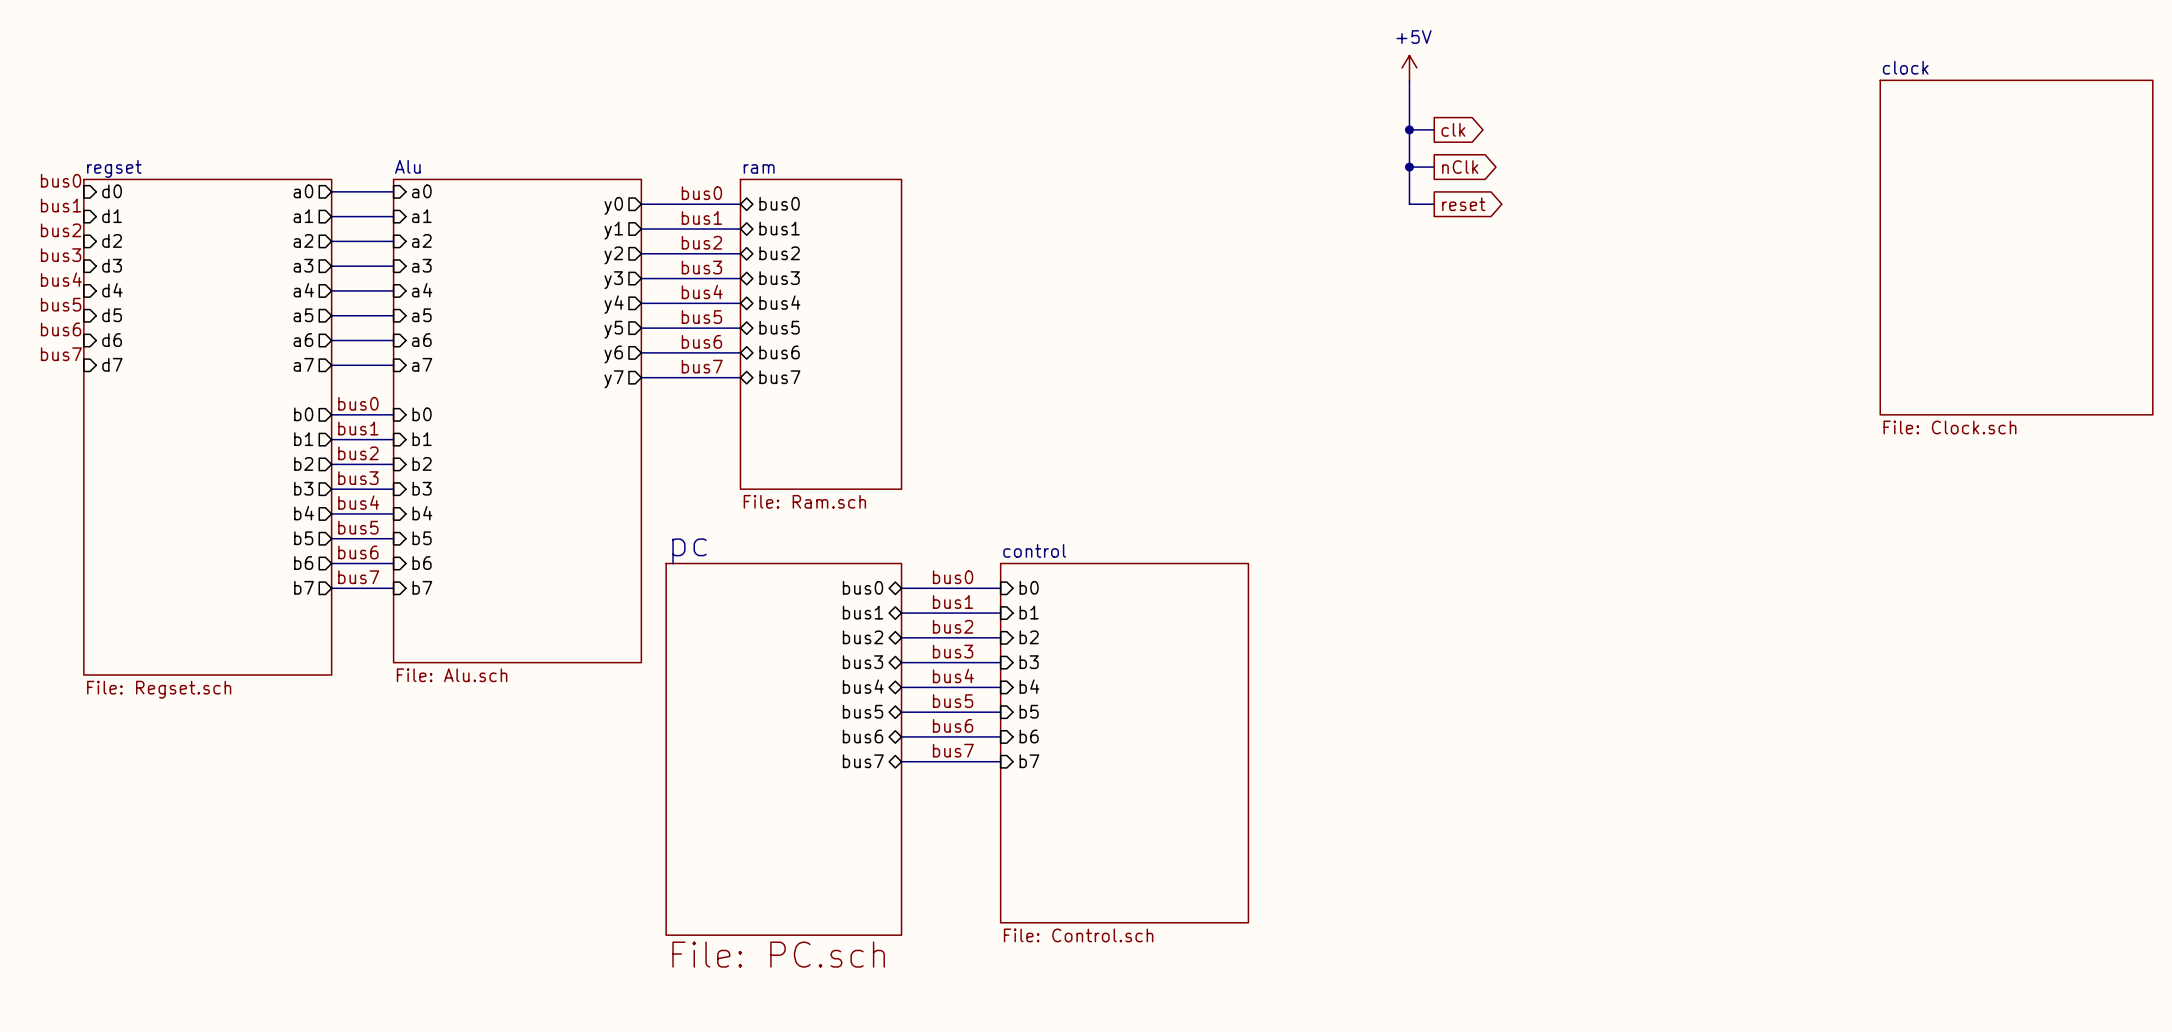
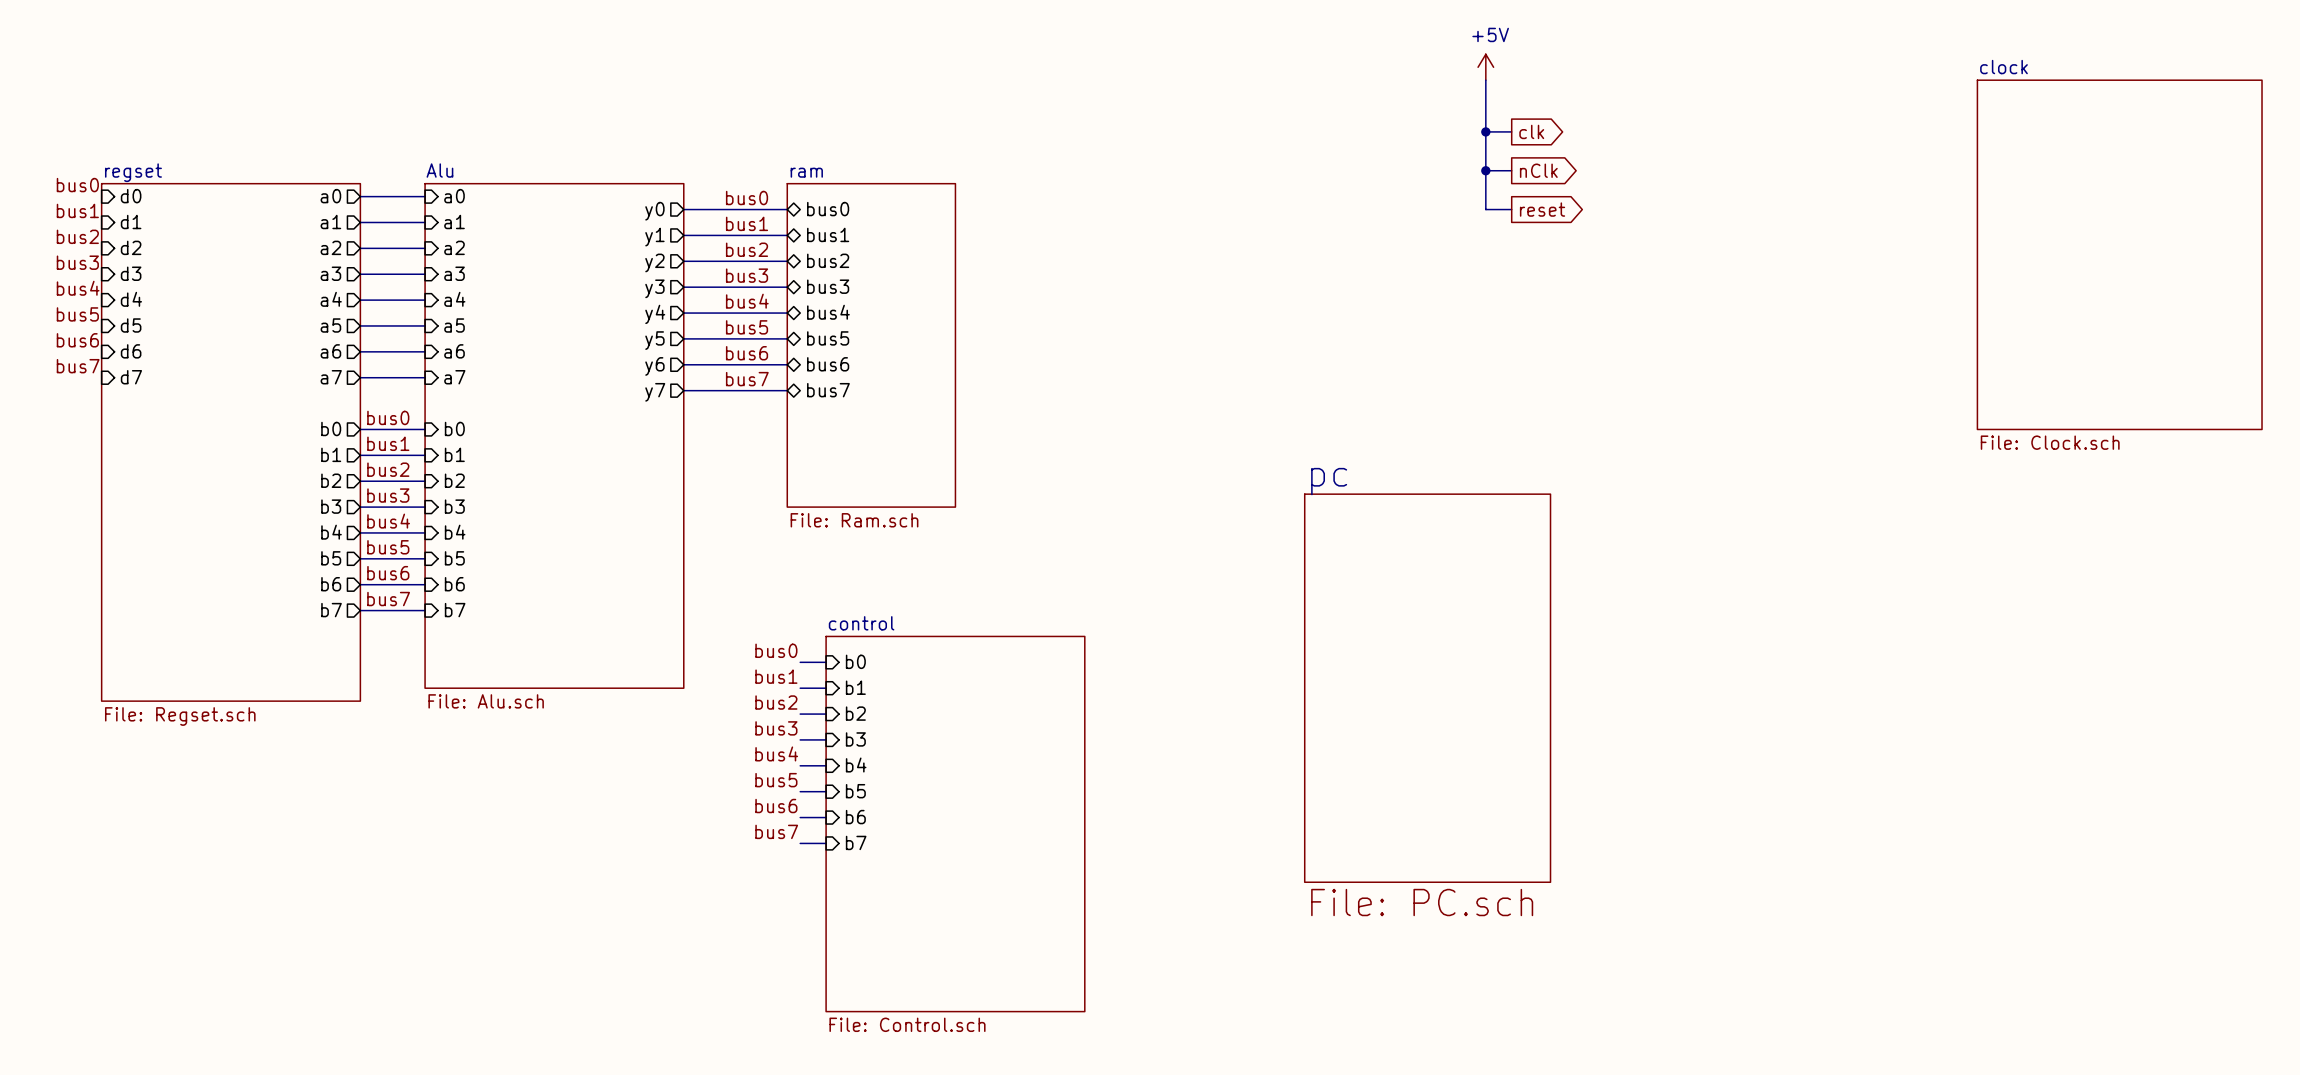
label position: bus0 (953, 577) -> bus0 (776, 650)
sheet pin: bus0 (862, 587) -> none
sheet pin position: b0 (1029, 587) -> b0 (855, 661)
wire: (901, 588) (1000, 588) -> none
label position: bus1 (953, 602) -> bus1 (776, 676)
sheet pin: bus1 (862, 612) -> none
sheet pin position: b1 (1029, 612) -> b1 (855, 687)
label position: bus2 (953, 626) -> bus2 (776, 702)
wire: none -> (800, 662) (826, 662)
sheet pin: bus2 (862, 637) -> none
wire: (901, 637) (1000, 637) -> none
sheet pin position: b2 (1029, 637) -> b2 (855, 713)
label position: bus3 (953, 651) -> bus3 (776, 728)
wire: none -> (800, 688) (826, 688)
sheet pin: bus3 (862, 662) -> none
wire: (901, 662) (1000, 662) -> none
sheet pin position: b3 (1029, 662) -> b3 (855, 739)
sheet pc: none -> File: PC.sch (1427, 688)
label position: bus4 (953, 676) -> bus4 (776, 753)
sheet pin: bus4 (863, 686) -> none
sheet pin position: b4 (1029, 686) -> b4 (856, 765)
wire: none -> (800, 714) (826, 714)
wire: (901, 687) (1000, 687) -> none
label position: bus5 (953, 701) -> bus5 (776, 780)
sheet pin: bus5 (862, 711) -> none
sheet pin position: b5 (1029, 711) -> b5 (855, 791)
wire: none -> (800, 739) (826, 739)
wire: (901, 712) (1000, 712) -> none
label position: bus6 (953, 725) -> bus6 (776, 806)
wire: none -> (800, 765) (826, 765)
sheet pin: bus6 (862, 736) -> none
wire: (901, 736) (1000, 736) -> none
sheet pin position: b6 (1029, 736) -> b6 (855, 817)
sheet control position: (1124, 743) -> (955, 824)
sheet pc: File: PC.sch (783, 749) -> none
label position: bus7 (953, 750) -> bus7 (776, 831)
wire: none -> (800, 791) (826, 791)
sheet pin: bus7 (863, 761) -> none
wire: (901, 761) (1000, 761) -> none
sheet pin position: b7 (1029, 761) -> b7 (856, 842)
wire: none -> (800, 817) (826, 817)
wire: none -> (800, 843) (826, 843)

